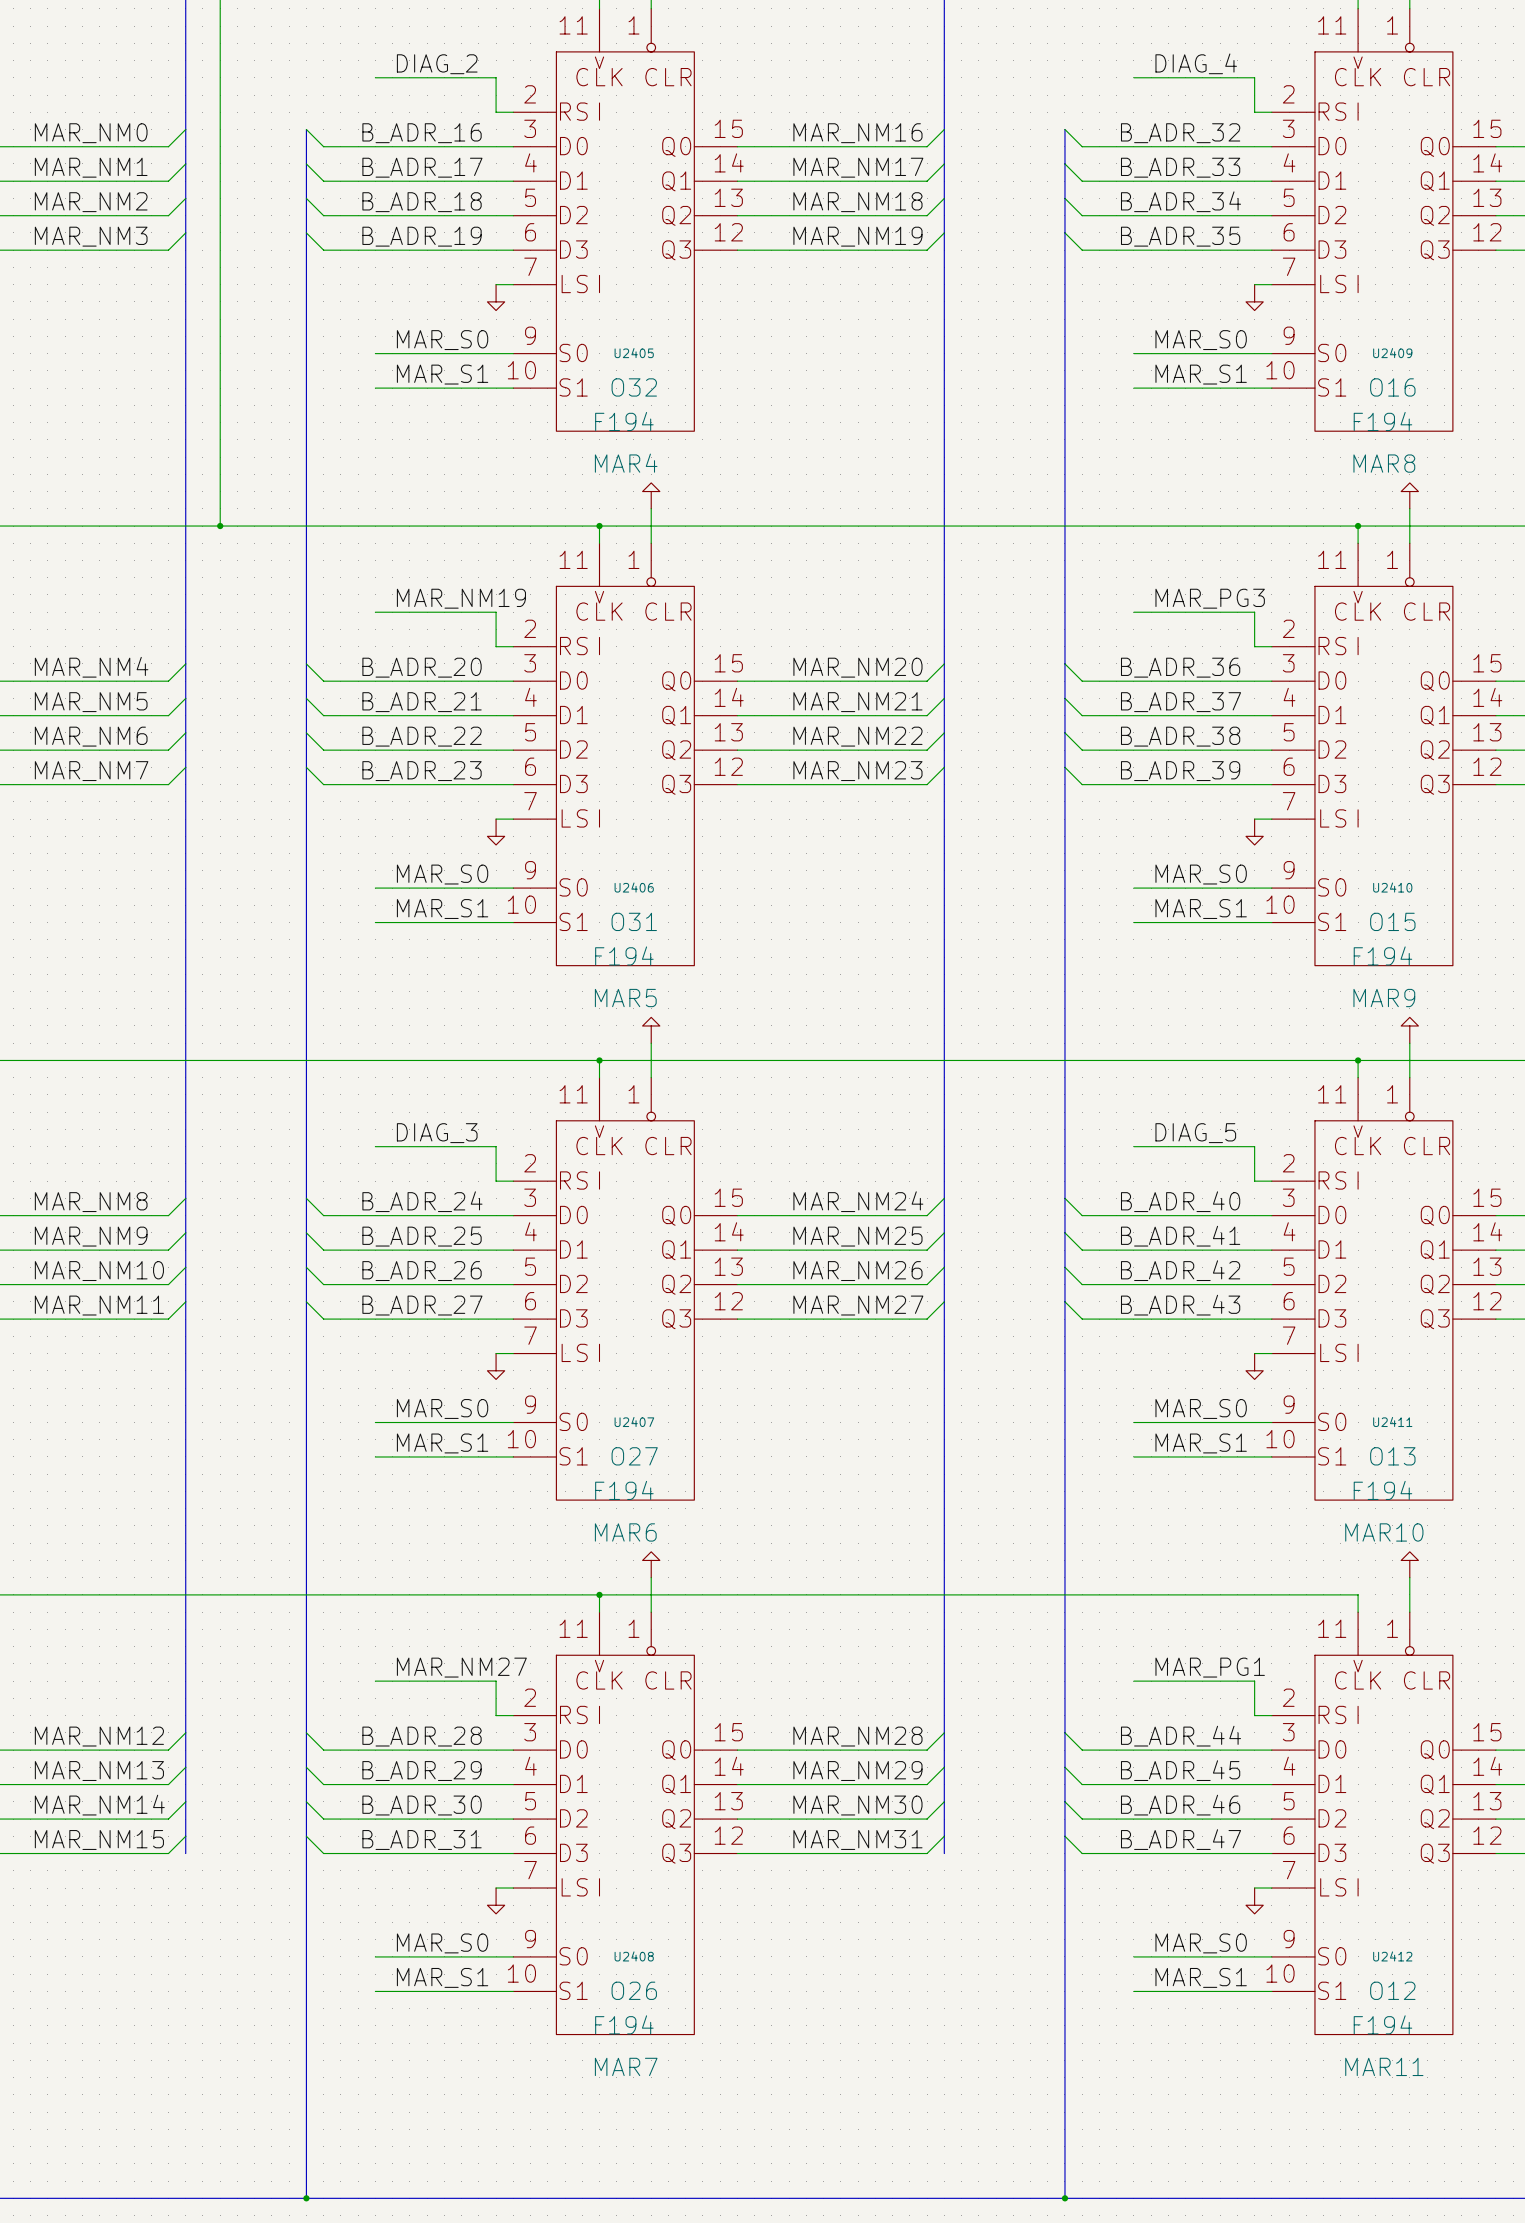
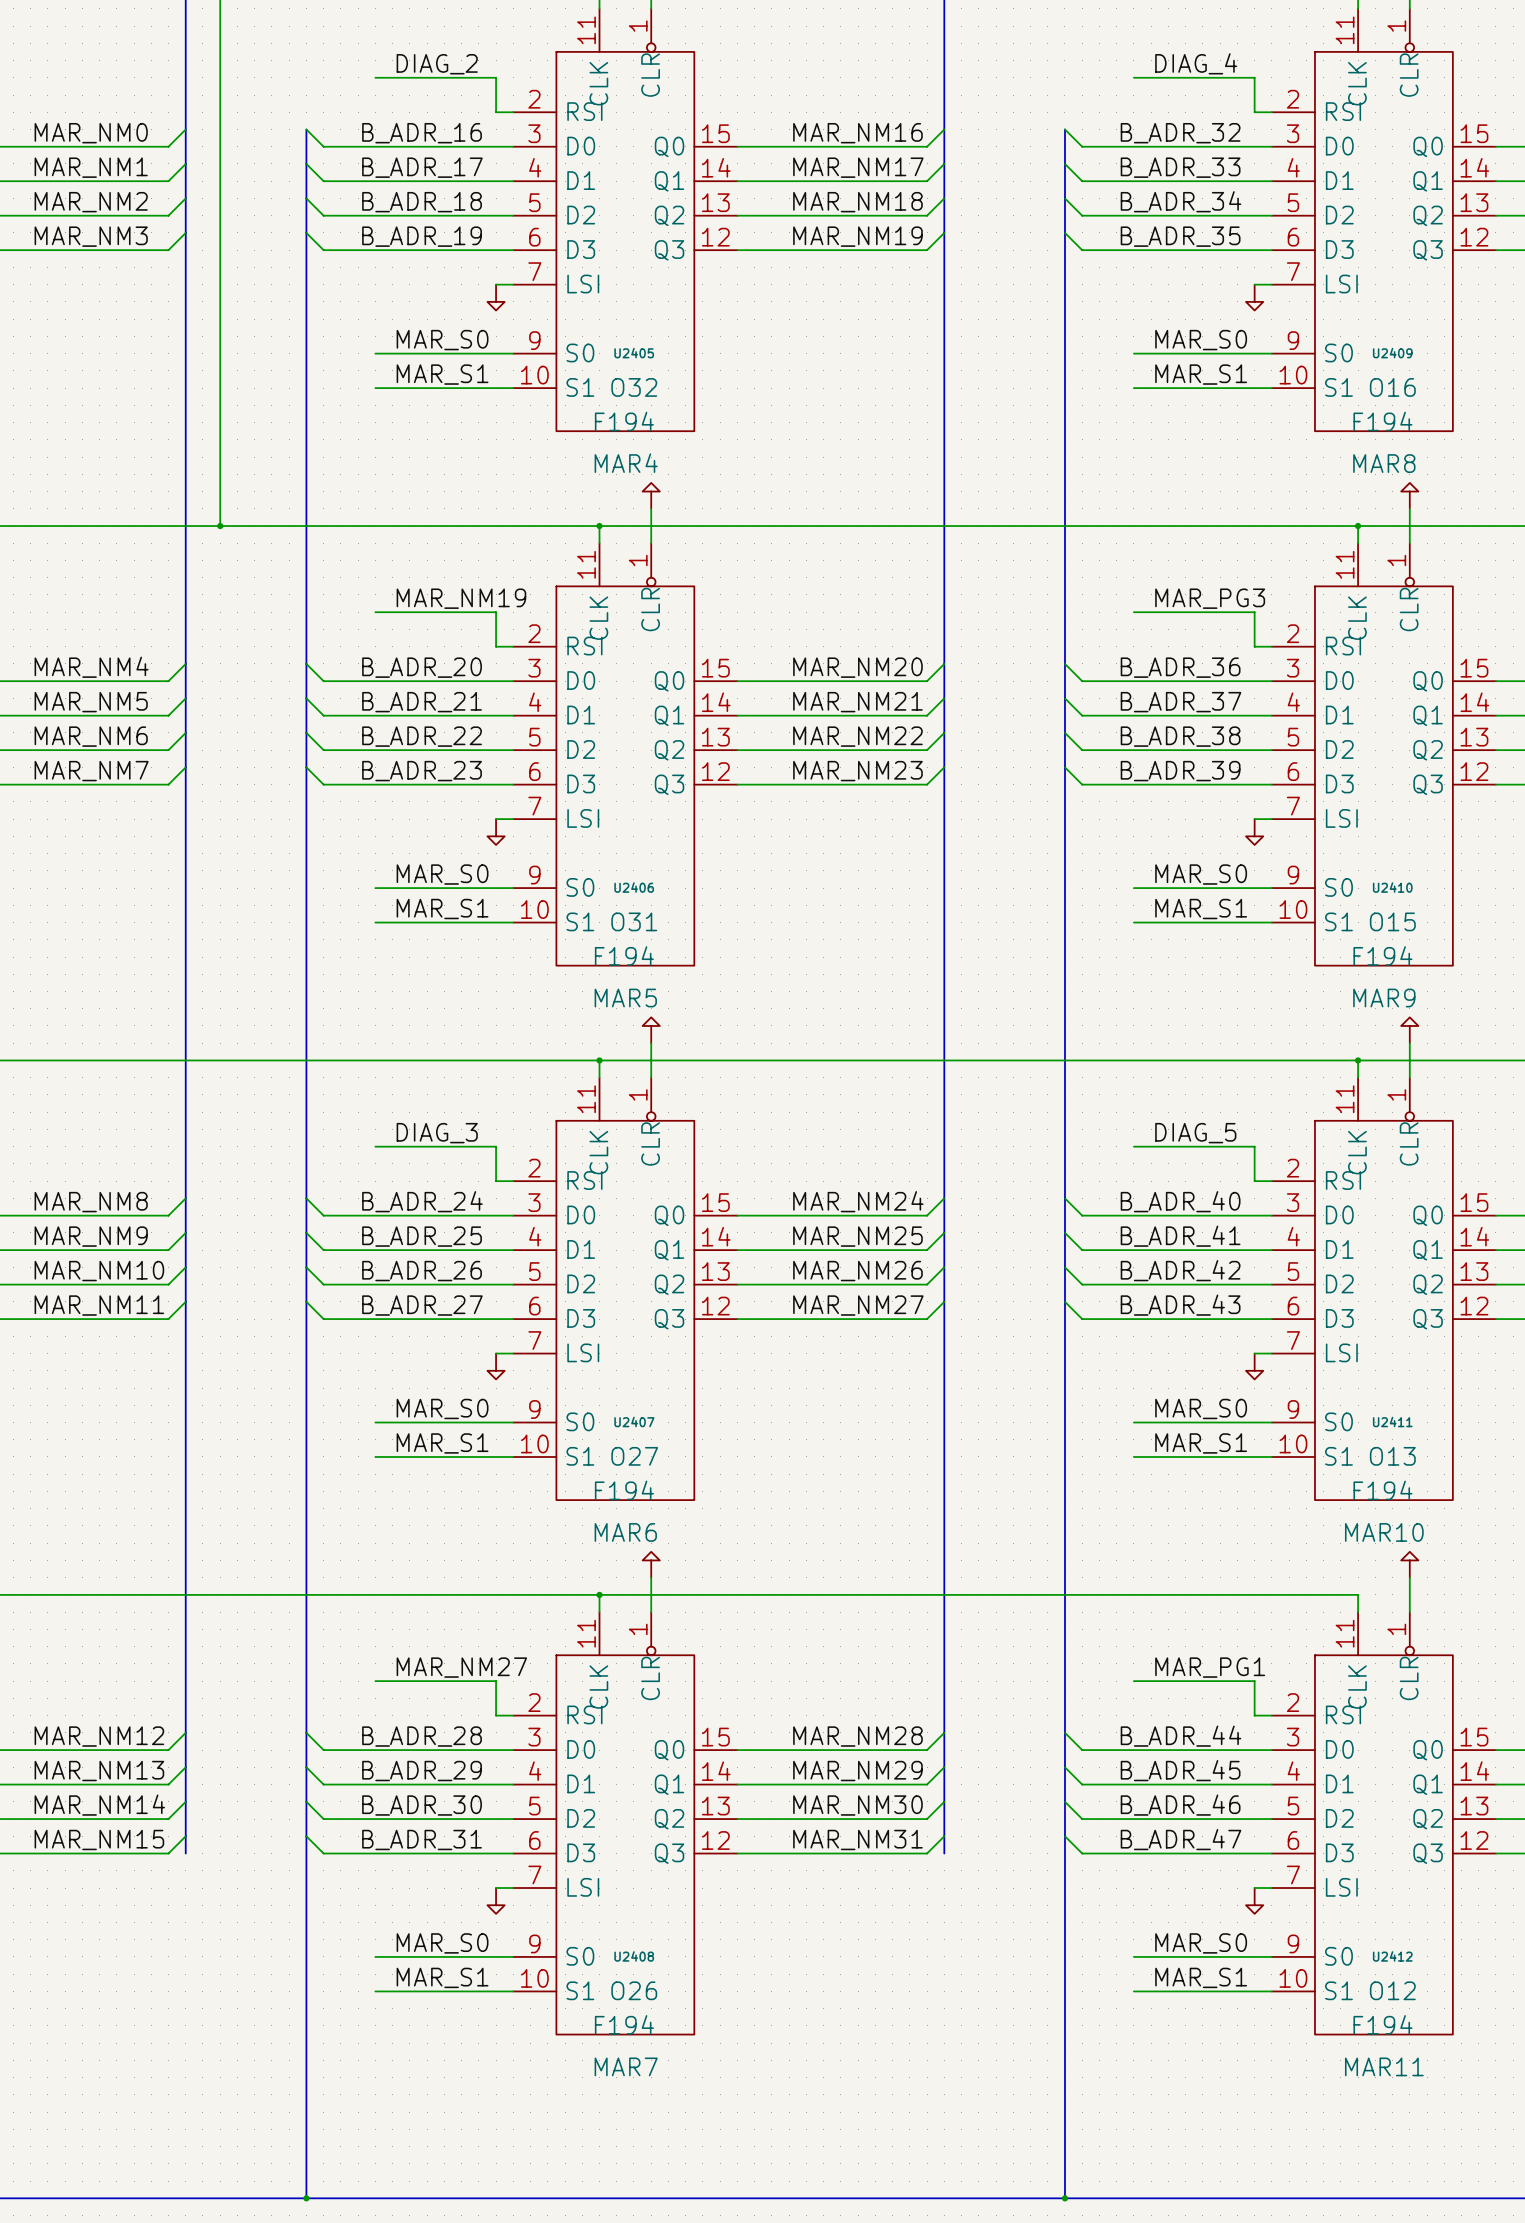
U2405 symbol: [513, 8, 738, 432] -> [513, 8, 738, 432]
U2409 symbol: [1271, 8, 1496, 432] -> [1271, 8, 1496, 432]
U2406 symbol: [513, 543, 738, 966] -> [513, 543, 738, 966]
U2410 symbol: [1271, 543, 1496, 966] -> [1271, 543, 1496, 966]
U2407 symbol: [513, 1077, 738, 1501] -> [513, 1077, 738, 1501]
U2411 symbol: [1271, 1077, 1496, 1501] -> [1271, 1077, 1496, 1501]
U2408 symbol: [513, 1612, 738, 2035] -> [513, 1612, 738, 2035]
U2412 symbol: [1271, 1612, 1496, 2035] -> [1271, 1612, 1496, 2035]

